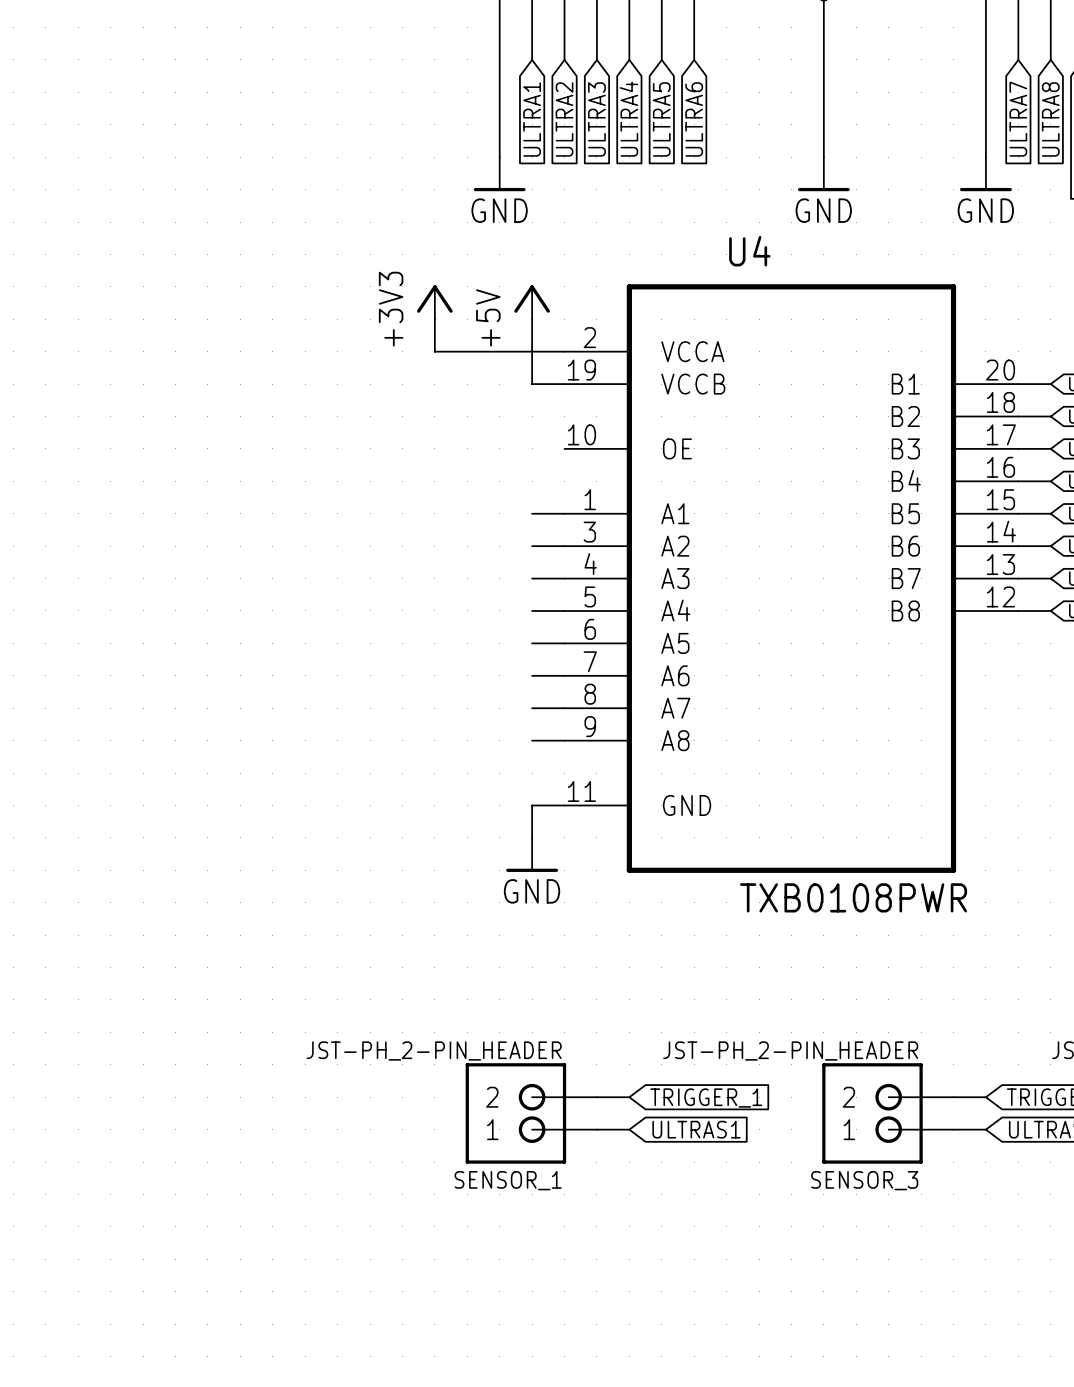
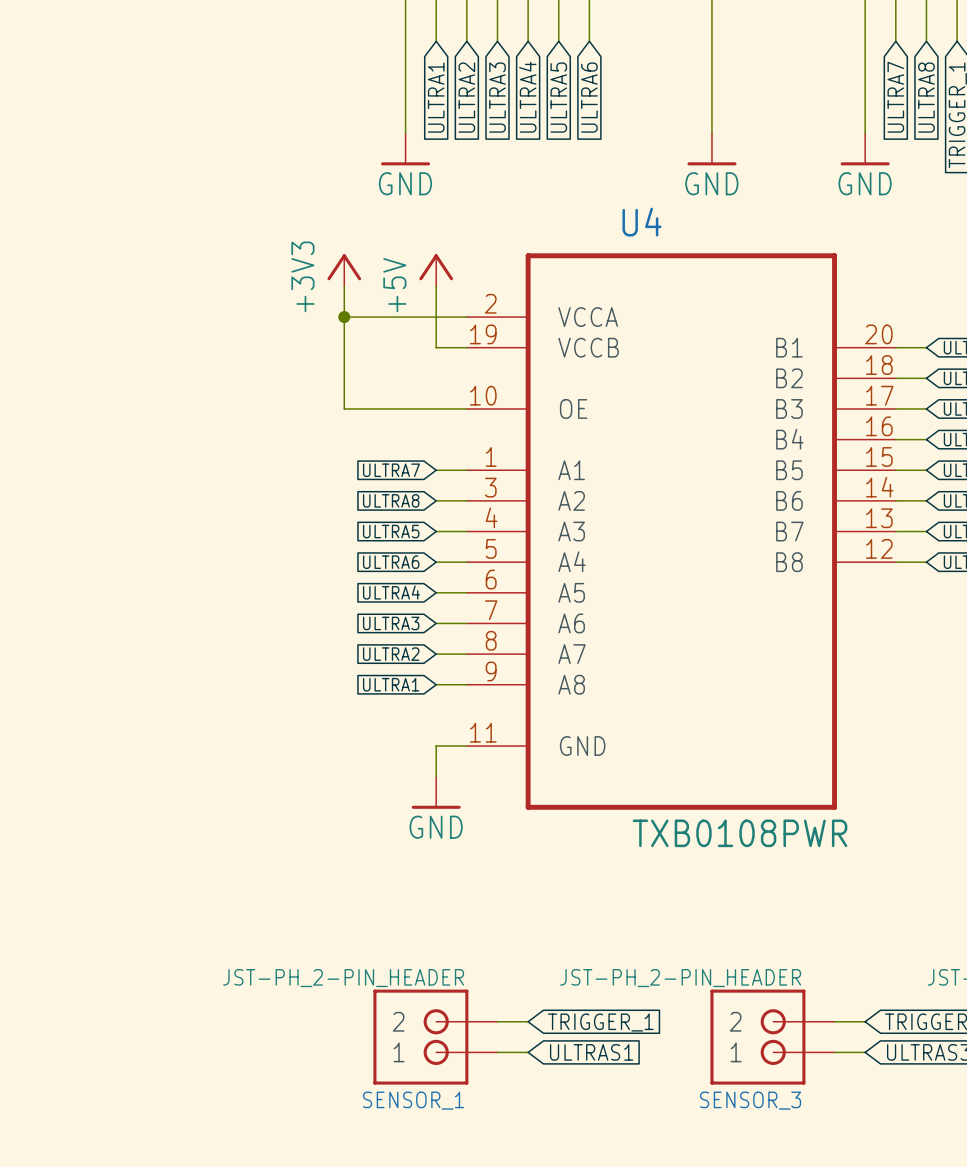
wire: none -> (344, 317) (344, 408) (466, 408)
junction: none -> (344, 317)
global label: none -> ULTRA7 (391, 470)
global label: none -> ULTRA8 (391, 500)
global label: none -> ULTRA5 (391, 531)
global label: none -> ULTRA6 (391, 562)
global label: none -> ULTRA4 (391, 592)
global label: none -> ULTRA3 (391, 623)
global label: none -> ULTRA2 (391, 654)
global label: none -> ULTRA1 (391, 684)

